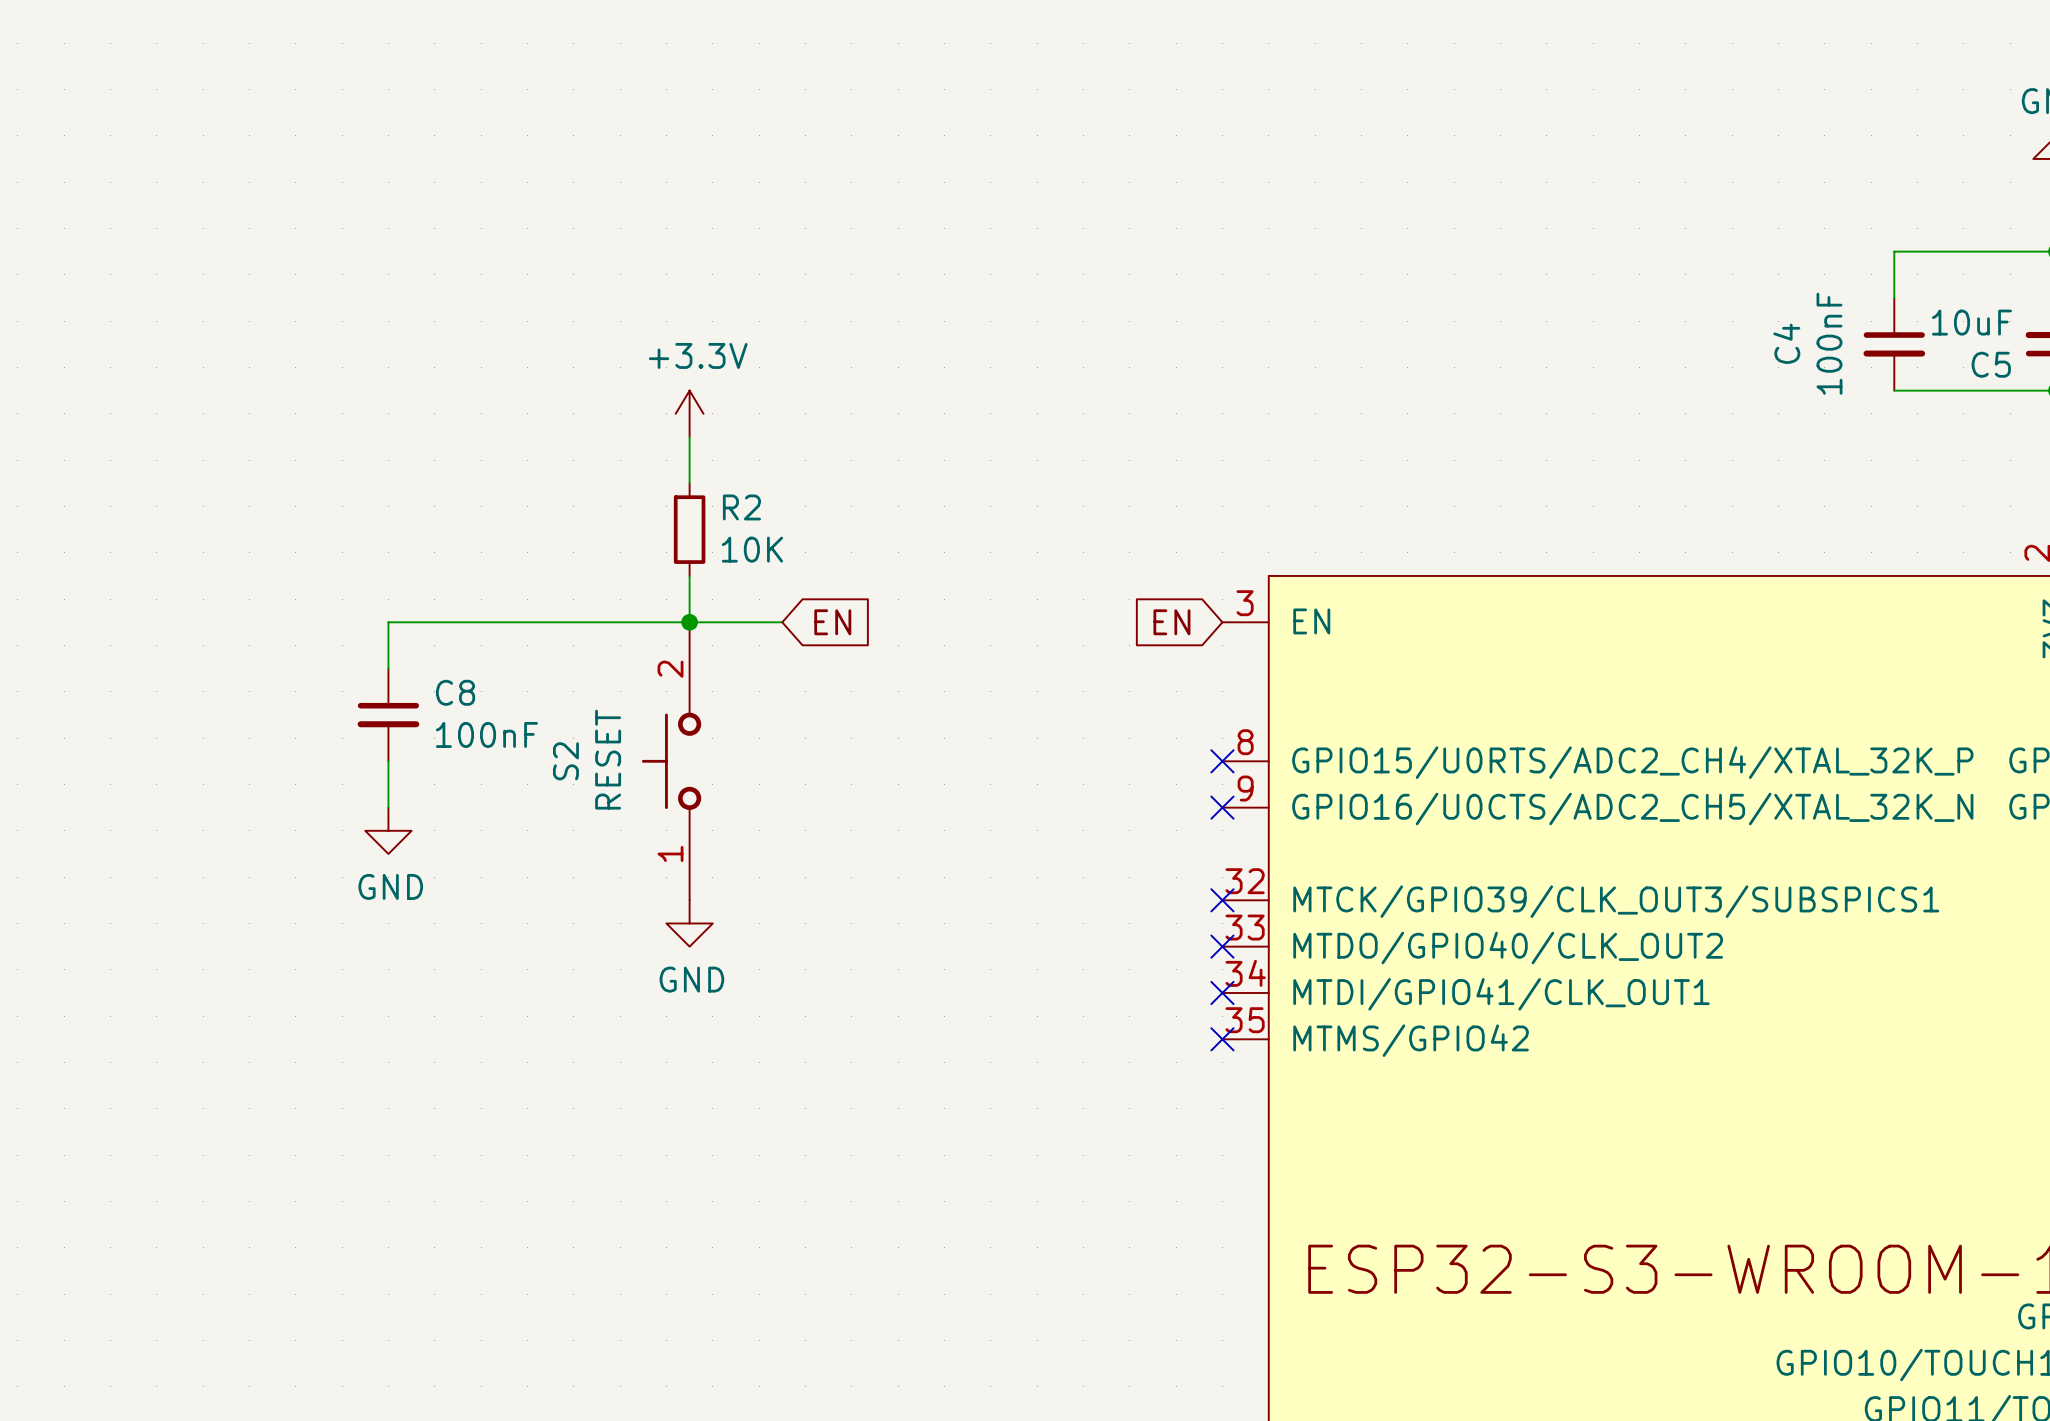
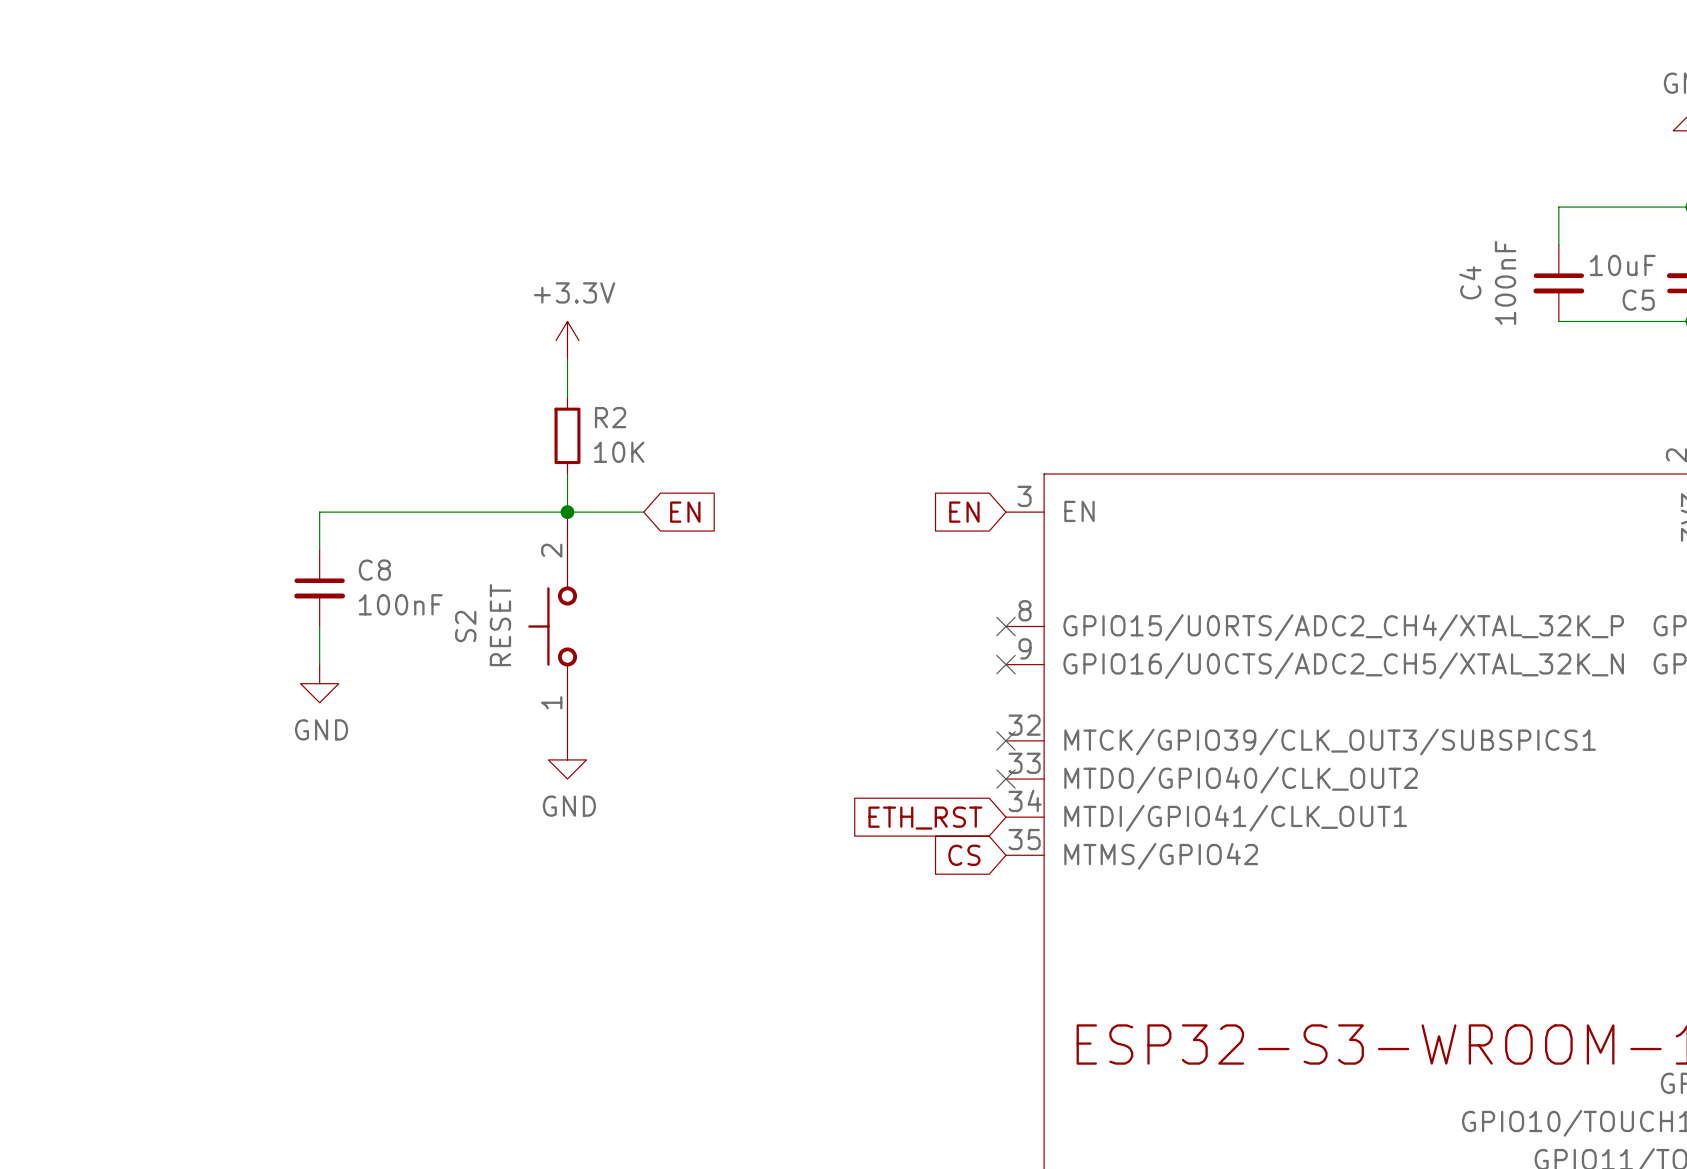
no-connect mark: (1222, 992) -> none
global label: none -> ETH_RST (925, 818)
global label: none -> CS (964, 855)
no-connect mark: (1222, 1039) -> none

